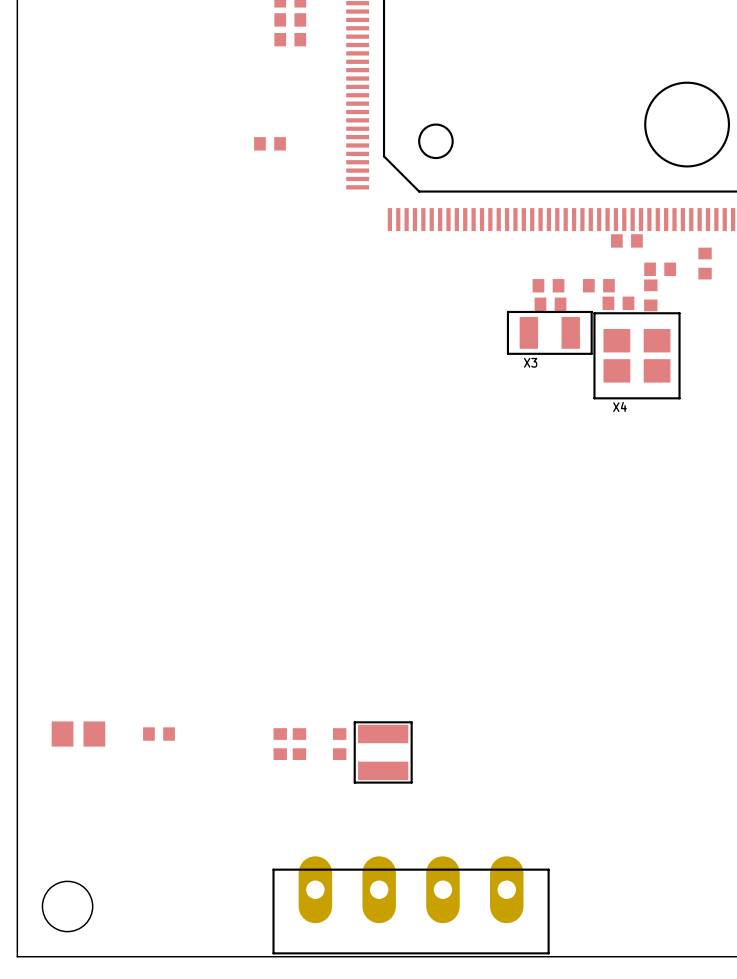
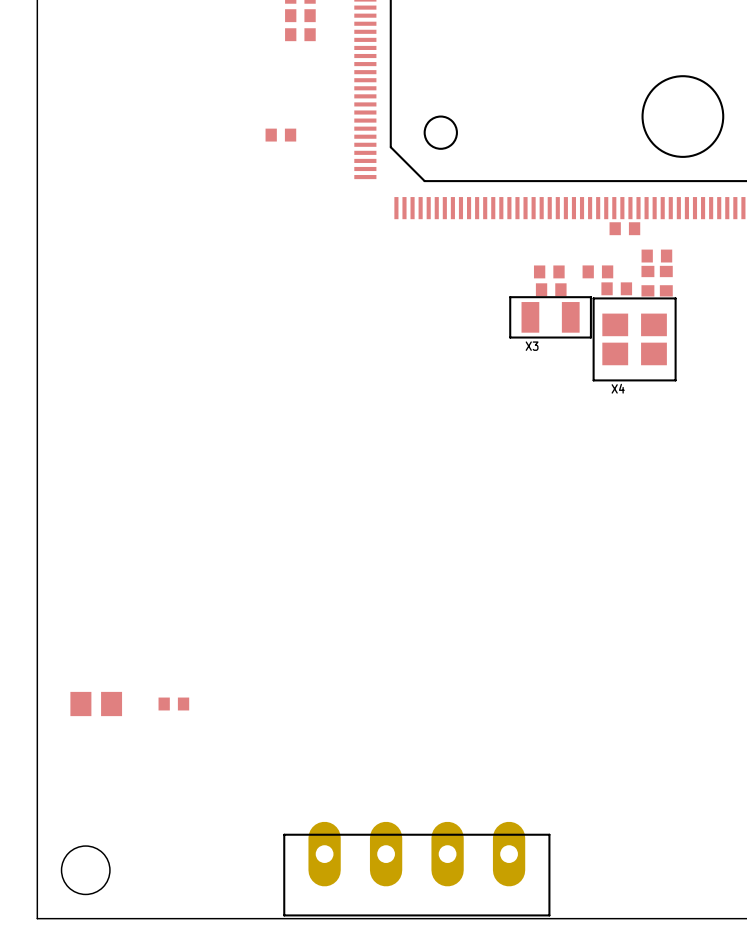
part position: (705, 263) -> (666, 281)
part: (280, 744) -> none
part: (299, 744) -> none
part: (339, 744) -> none
part: (383, 752) -> none

